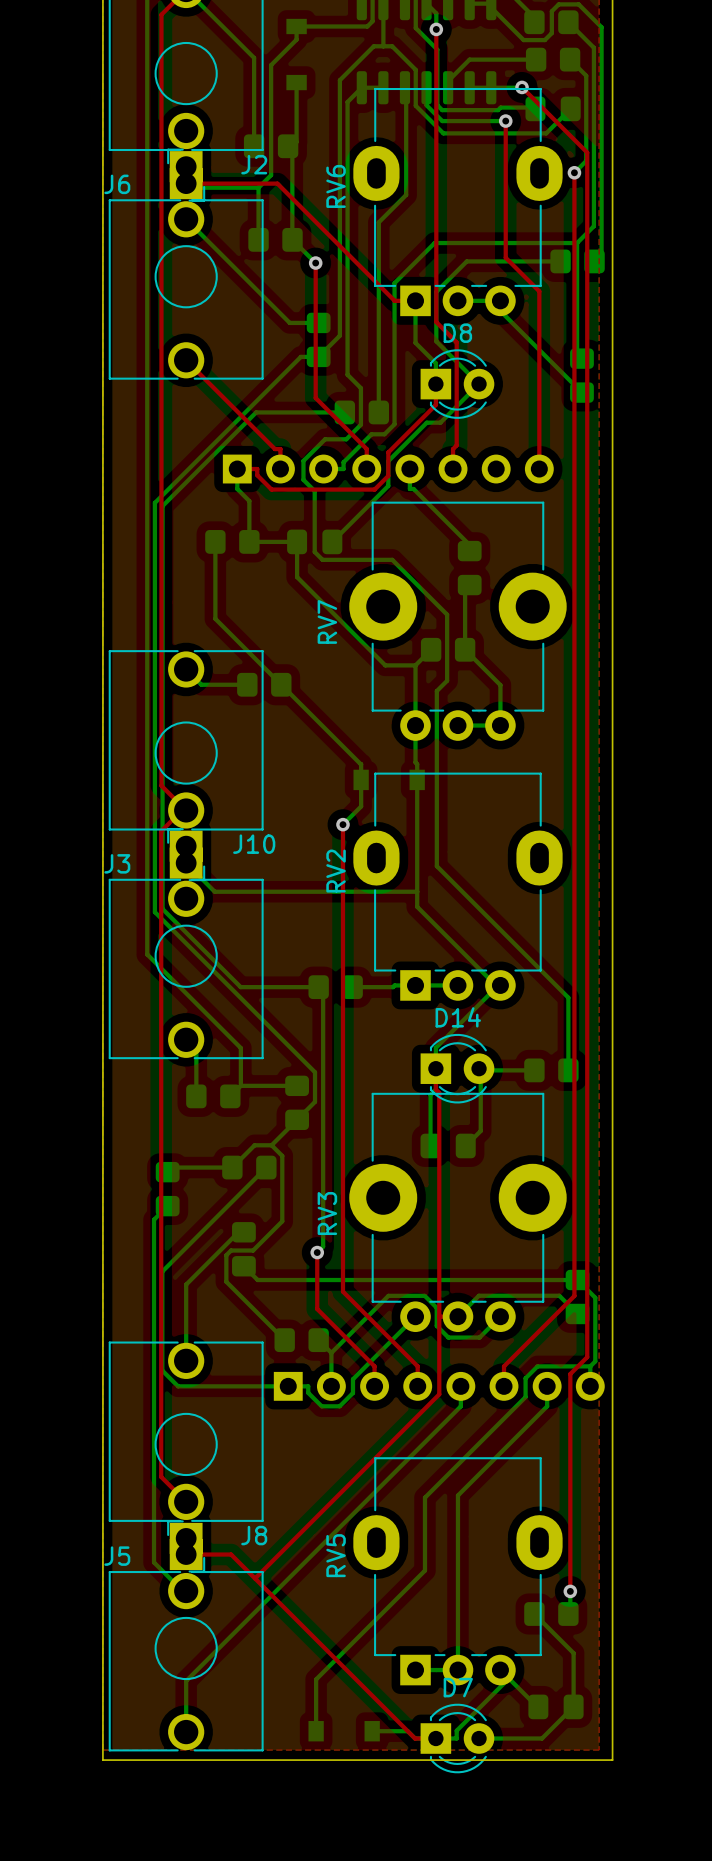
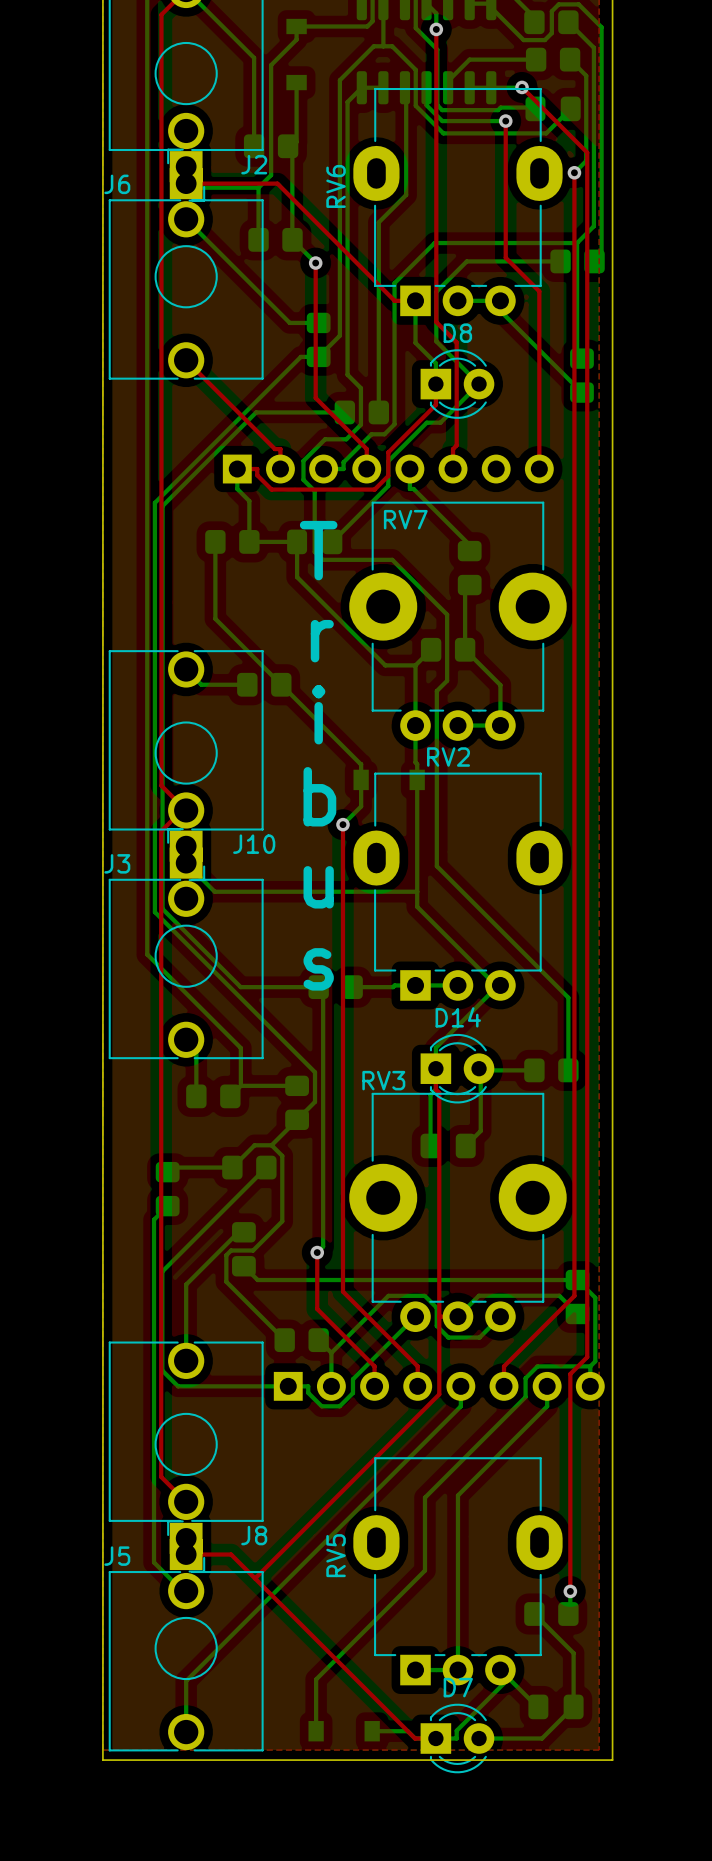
text: none -> T (318, 550)
RV7 name rotation: 0° (327, 621) -> 90° clockwise (405, 519)
RV7 name position: RV7 (327, 621) -> RV7 (405, 519)
text: none -> r (322, 641)
text: none -> i (318, 714)
text: none -> b (319, 796)
RV2 name rotation: 0° (336, 871) -> 90° clockwise (448, 757)
RV2 name position: RV2 (336, 871) -> RV2 (448, 757)
text: none -> u (318, 887)
text: none -> s (318, 969)
RV3 name rotation: 0° (327, 1213) -> 90° clockwise (383, 1080)
RV3 name position: RV3 (327, 1213) -> RV3 (383, 1080)

